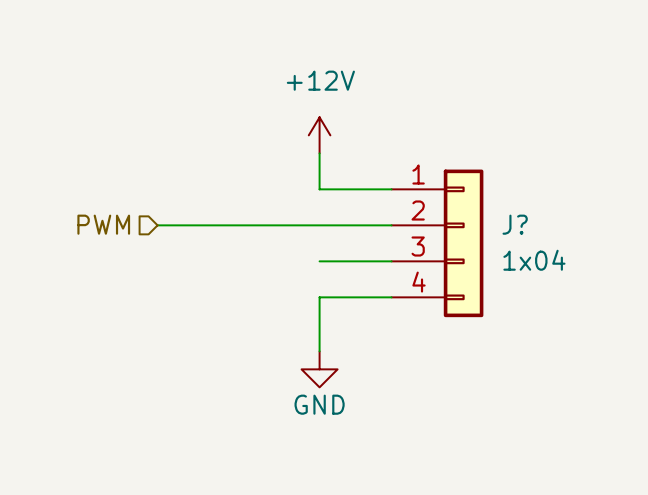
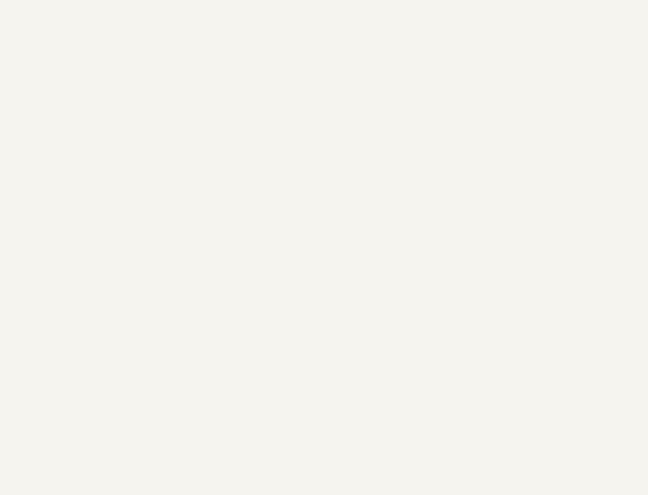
power symbol: +12V (319, 135) -> none
wire: (319, 153) (319, 189) (391, 189) -> none
hierarchical label: PWM (103, 224) -> none
wire: (157, 225) (391, 225) -> none
J?: (437, 243) -> none
wire: (319, 261) (391, 261) -> none
wire: (391, 297) (319, 297) (319, 351) -> none
power symbol: GND (319, 369) -> none

